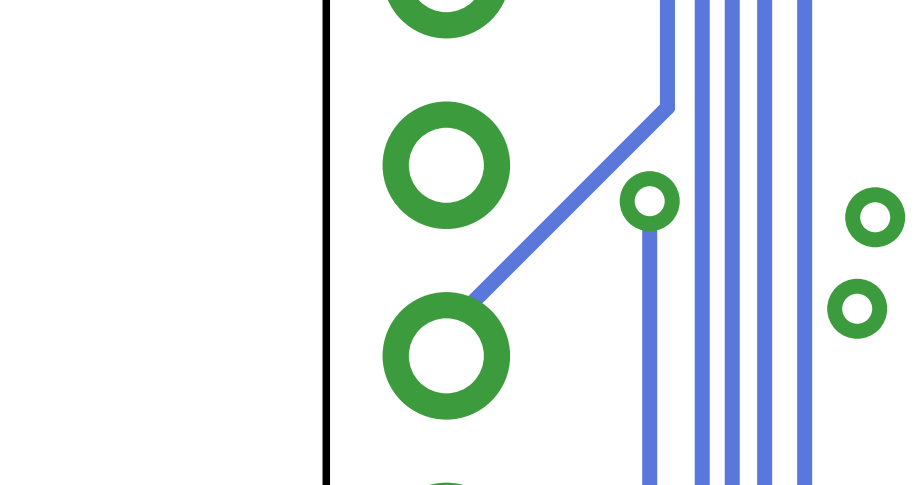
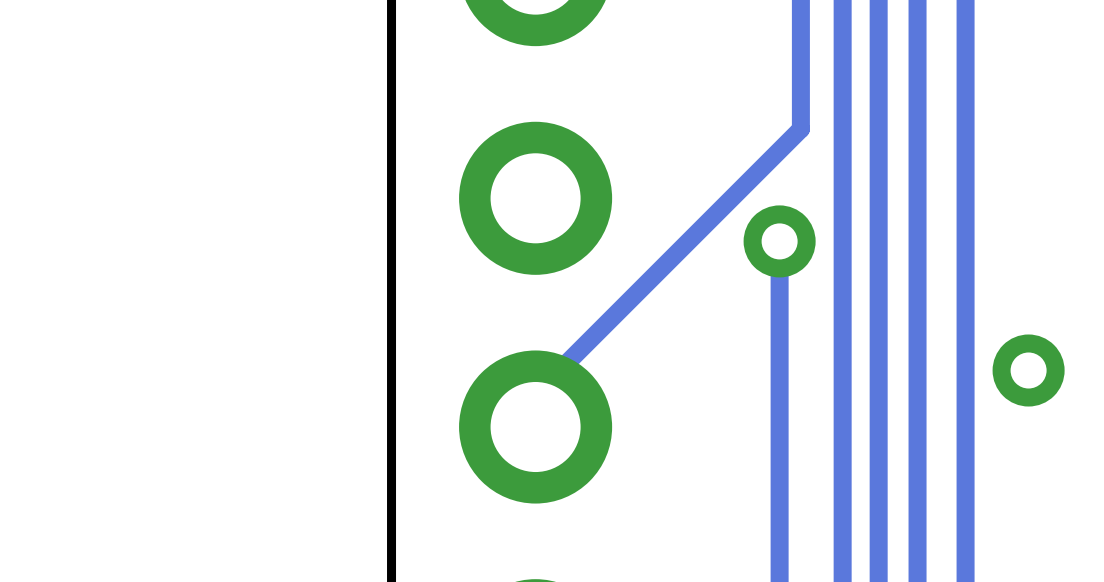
via: (875, 217) -> none

